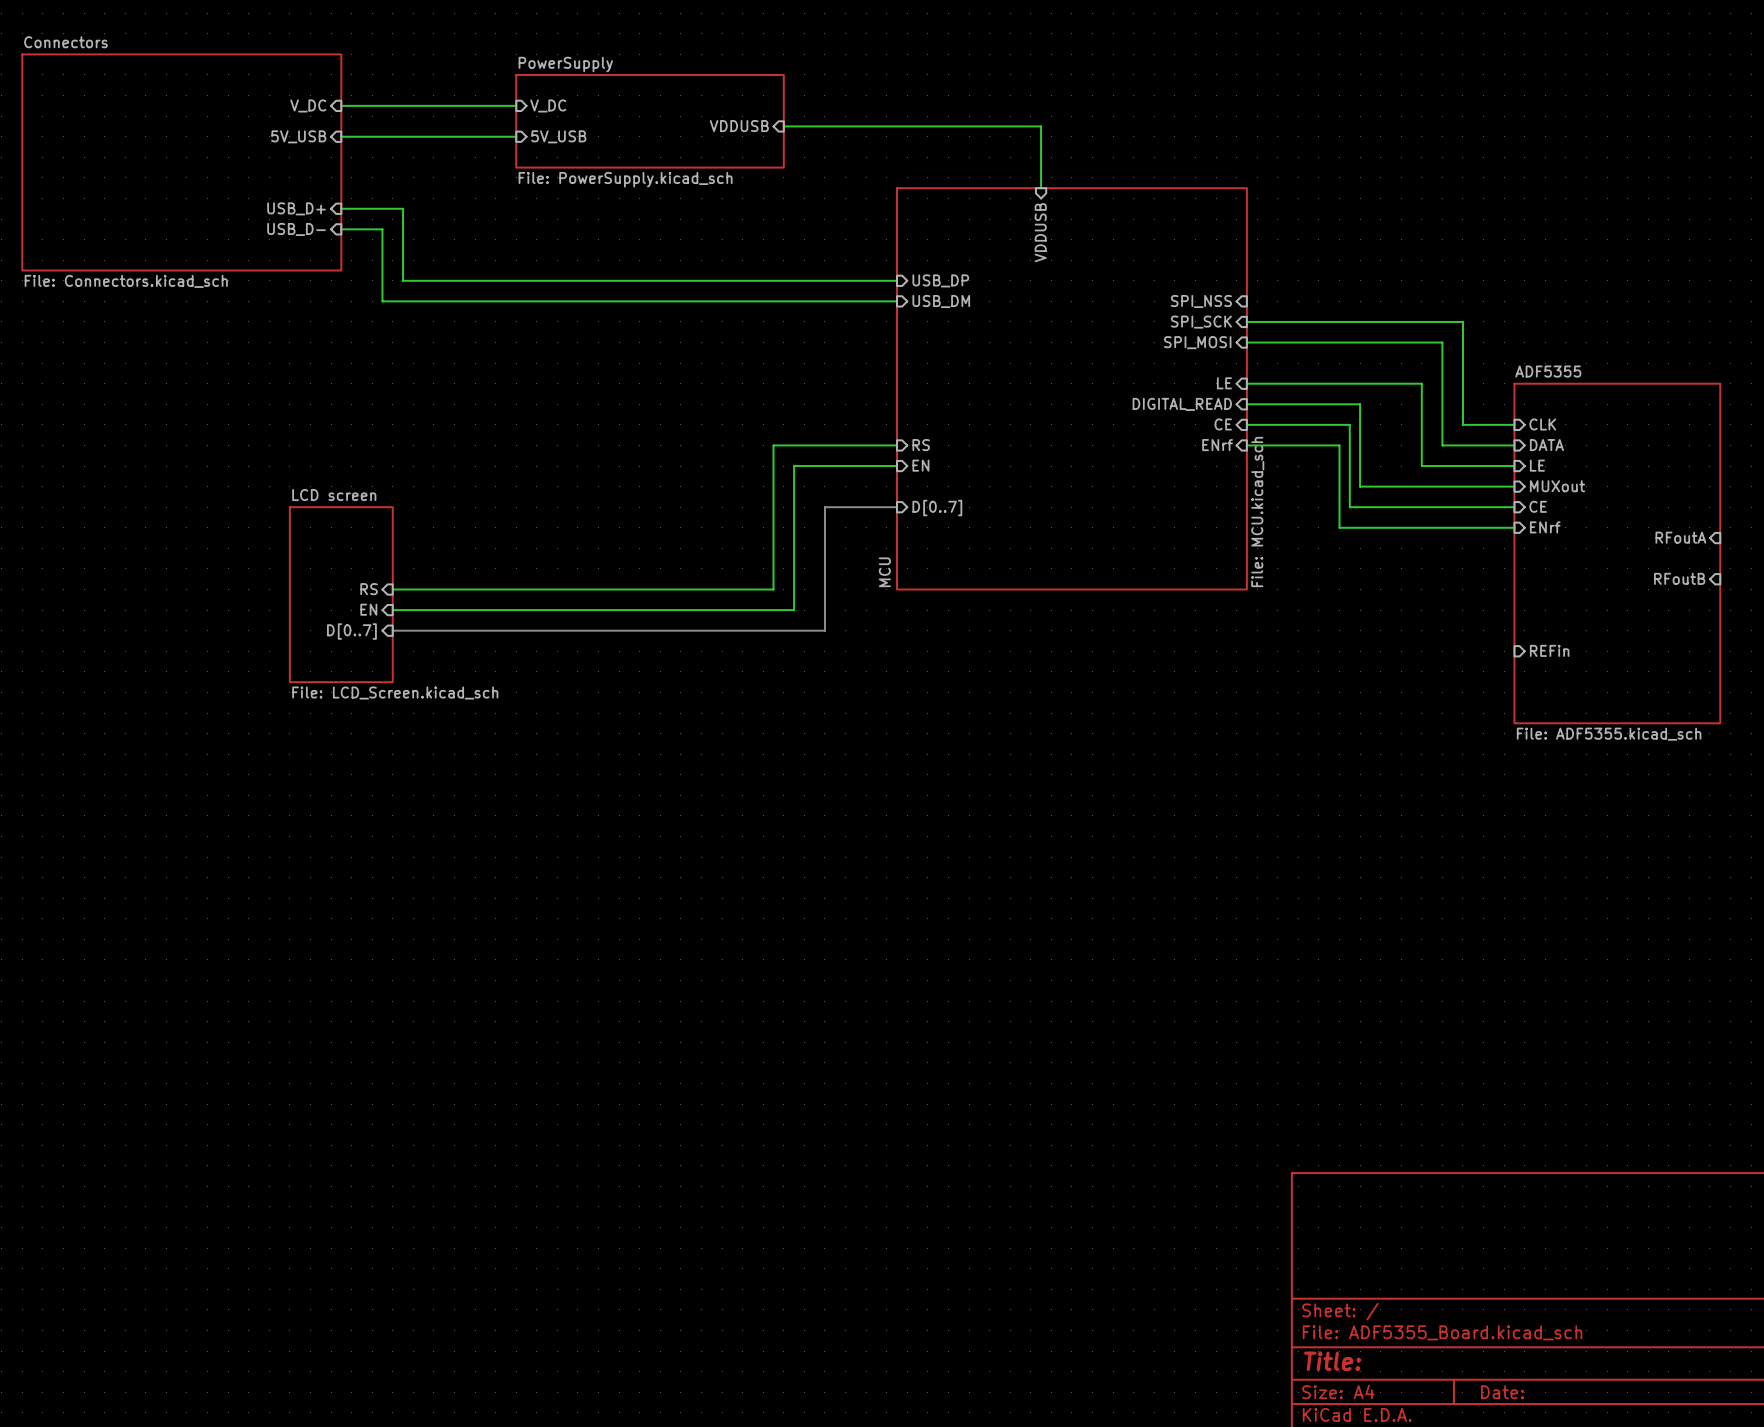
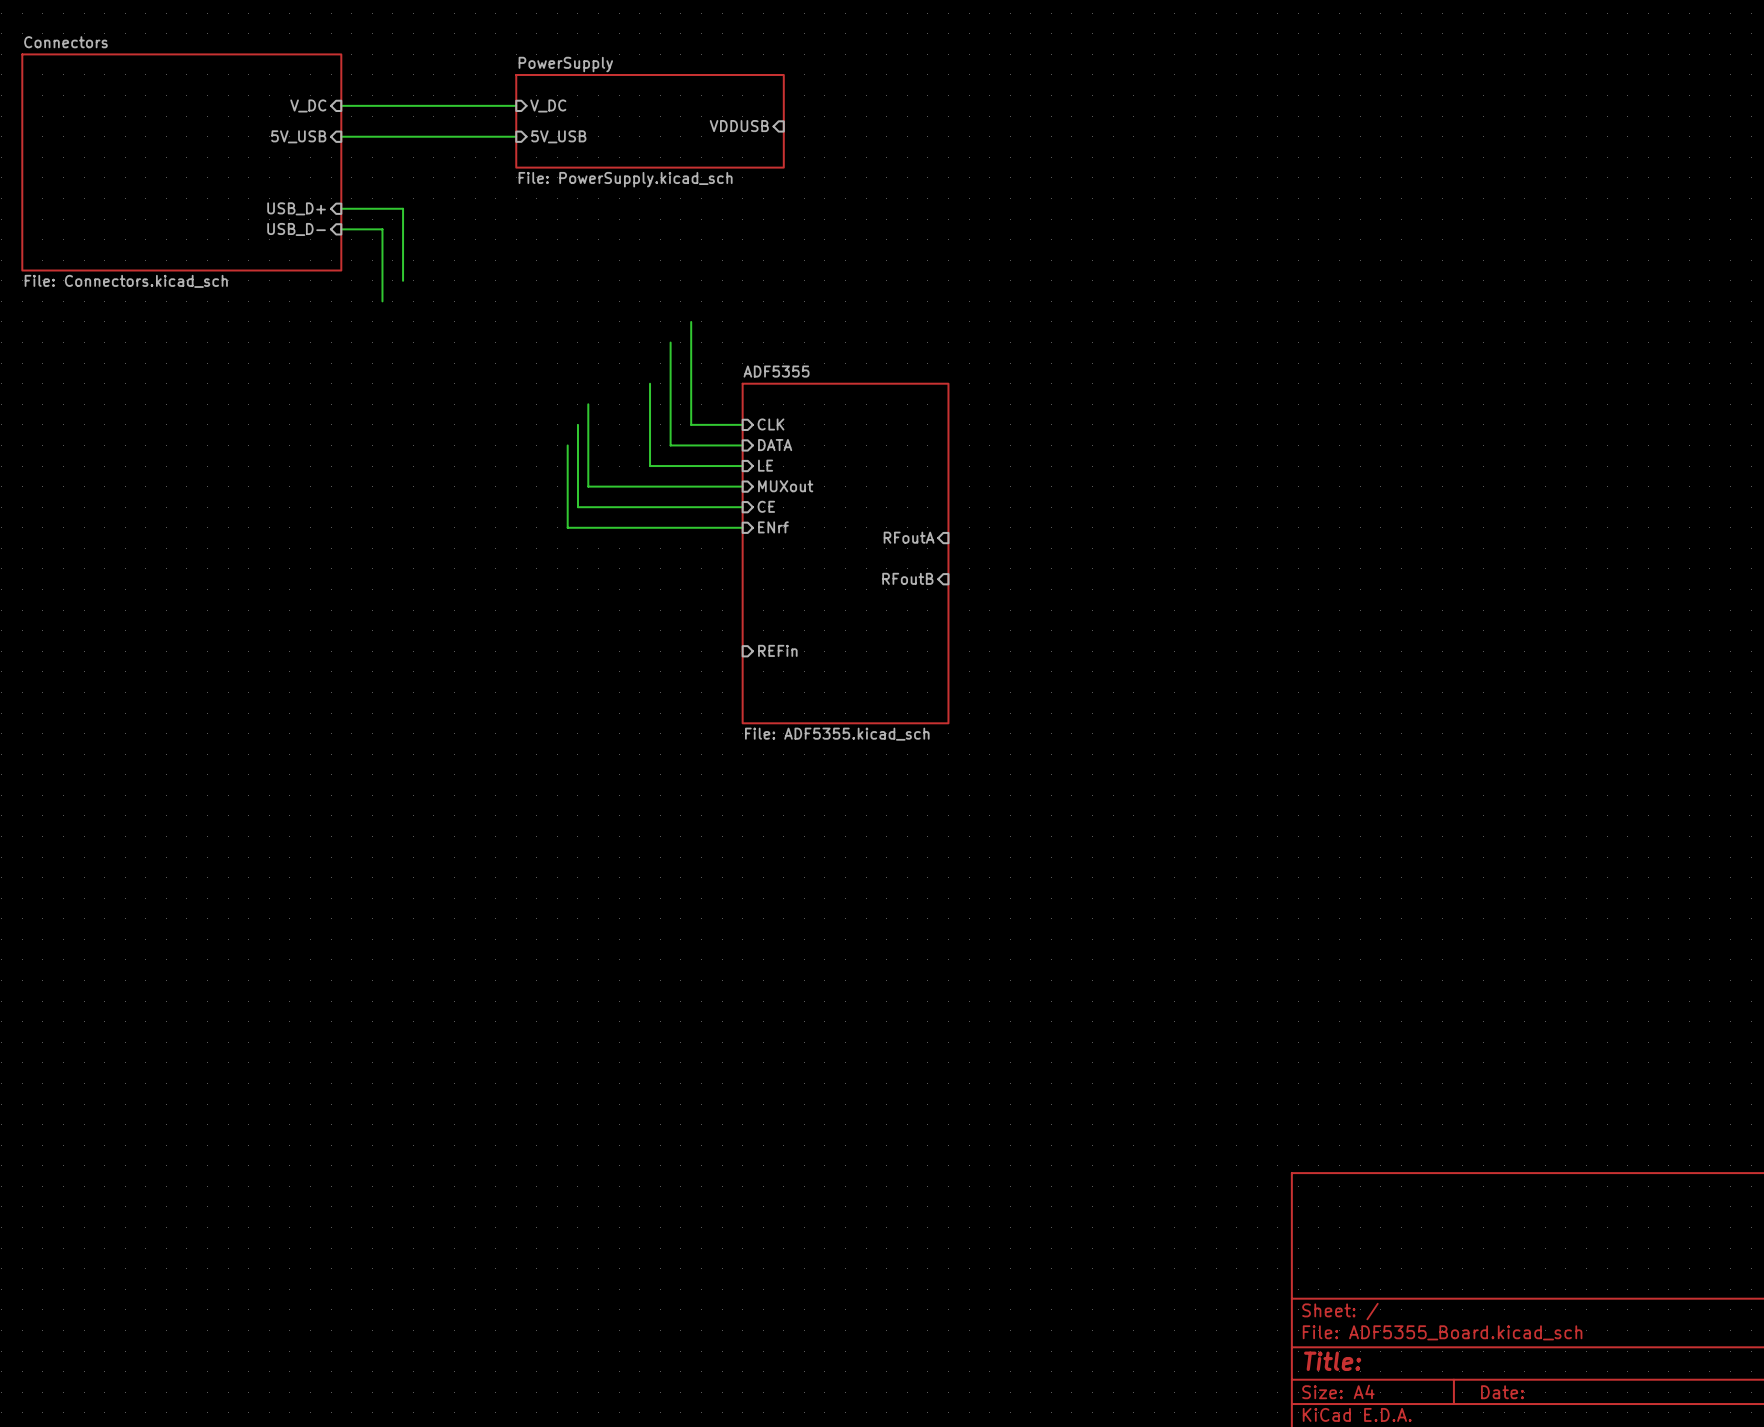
wire: (783, 126) (1041, 126) (1041, 188) -> none
sheet pin: VDDUSB (1040, 232) -> none
wire: (403, 280) (897, 280) -> none
sheet pin: USB_DP (940, 280) -> none
wire: (382, 301) (897, 301) -> none
sheet pin: USB_DM (941, 301) -> none
sheet pin: SPI_NSS (1201, 301) -> none
wire: none -> (691, 321) (691, 424) (742, 424)
wire: (1246, 321) (1462, 321) (1462, 424) (1514, 424) -> none
sheet pin: SPI_SCK (1201, 322) -> none
wire: none -> (670, 342) (670, 445) (742, 445)
sheet pin: SPI_MOSI (1197, 342) -> none
wire: (1246, 342) (1442, 342) (1442, 445) (1514, 445) -> none
wire: none -> (650, 383) (650, 466) (742, 466)
sheet pin: LE (1224, 383) -> none
wire: (1246, 383) (1421, 383) (1421, 466) (1514, 466) -> none
sheet MCU: File: MCU.kicad_sch (1071, 388) -> none
wire: none -> (588, 404) (588, 486) (742, 486)
sheet pin: DIGITAL_READ (1182, 404) -> none
wire: (1246, 404) (1360, 404) (1360, 486) (1514, 486) -> none
wire: none -> (577, 424) (577, 507) (742, 507)
sheet pin: none -> CLK (770, 424)
sheet pin: CE (1223, 424) -> none
wire: (1246, 424) (1349, 424) (1349, 507) (1514, 507) -> none
sheet pin: CLK (1542, 424) -> none
wire: none -> (567, 445) (567, 527) (742, 527)
sheet pin: none -> DATA (775, 445)
wire: (897, 445) (773, 445) (773, 589) (392, 589) -> none
sheet pin: RS (921, 445) -> none
sheet pin: ENrf (1217, 445) -> none
wire: (1246, 445) (1339, 445) (1339, 527) (1514, 527) -> none
sheet pin: DATA (1546, 445) -> none
sheet pin: none -> LE (765, 465)
sheet pin: EN (920, 465) -> none
sheet pin: LE (1537, 465) -> none
wire: (897, 466) (794, 466) (794, 610) (392, 610) -> none
sheet pin: none -> MUXout (785, 486)
sheet pin: MUXout (1557, 486) -> none
sheet pin: none -> CE (766, 506)
sheet pin: CE (1538, 506) -> none
bus: (897, 507) (824, 507) (824, 630) (392, 630) -> none
sheet pin: D[0..7] (937, 508) -> none
sheet pin: none -> ENrf (773, 527)
sheet pin: ENrf (1545, 527) -> none
sheet pin: none -> RFoutA (909, 537)
sheet pin: RFoutA (1680, 537) -> none
sheet ADF5355 position: (1617, 553) -> (845, 553)
sheet pin: none -> RFoutB (907, 578)
sheet pin: RFoutB (1679, 578) -> none
sheet pin: RS (369, 589) -> none
sheet LCD screen: File: LCD_Screen.kicad_sch (341, 594) -> none
sheet pin: EN (368, 609) -> none
sheet pin: D[0..7] (351, 631) -> none
sheet pin: none -> REFin (777, 650)
sheet pin: REFin (1549, 650) -> none

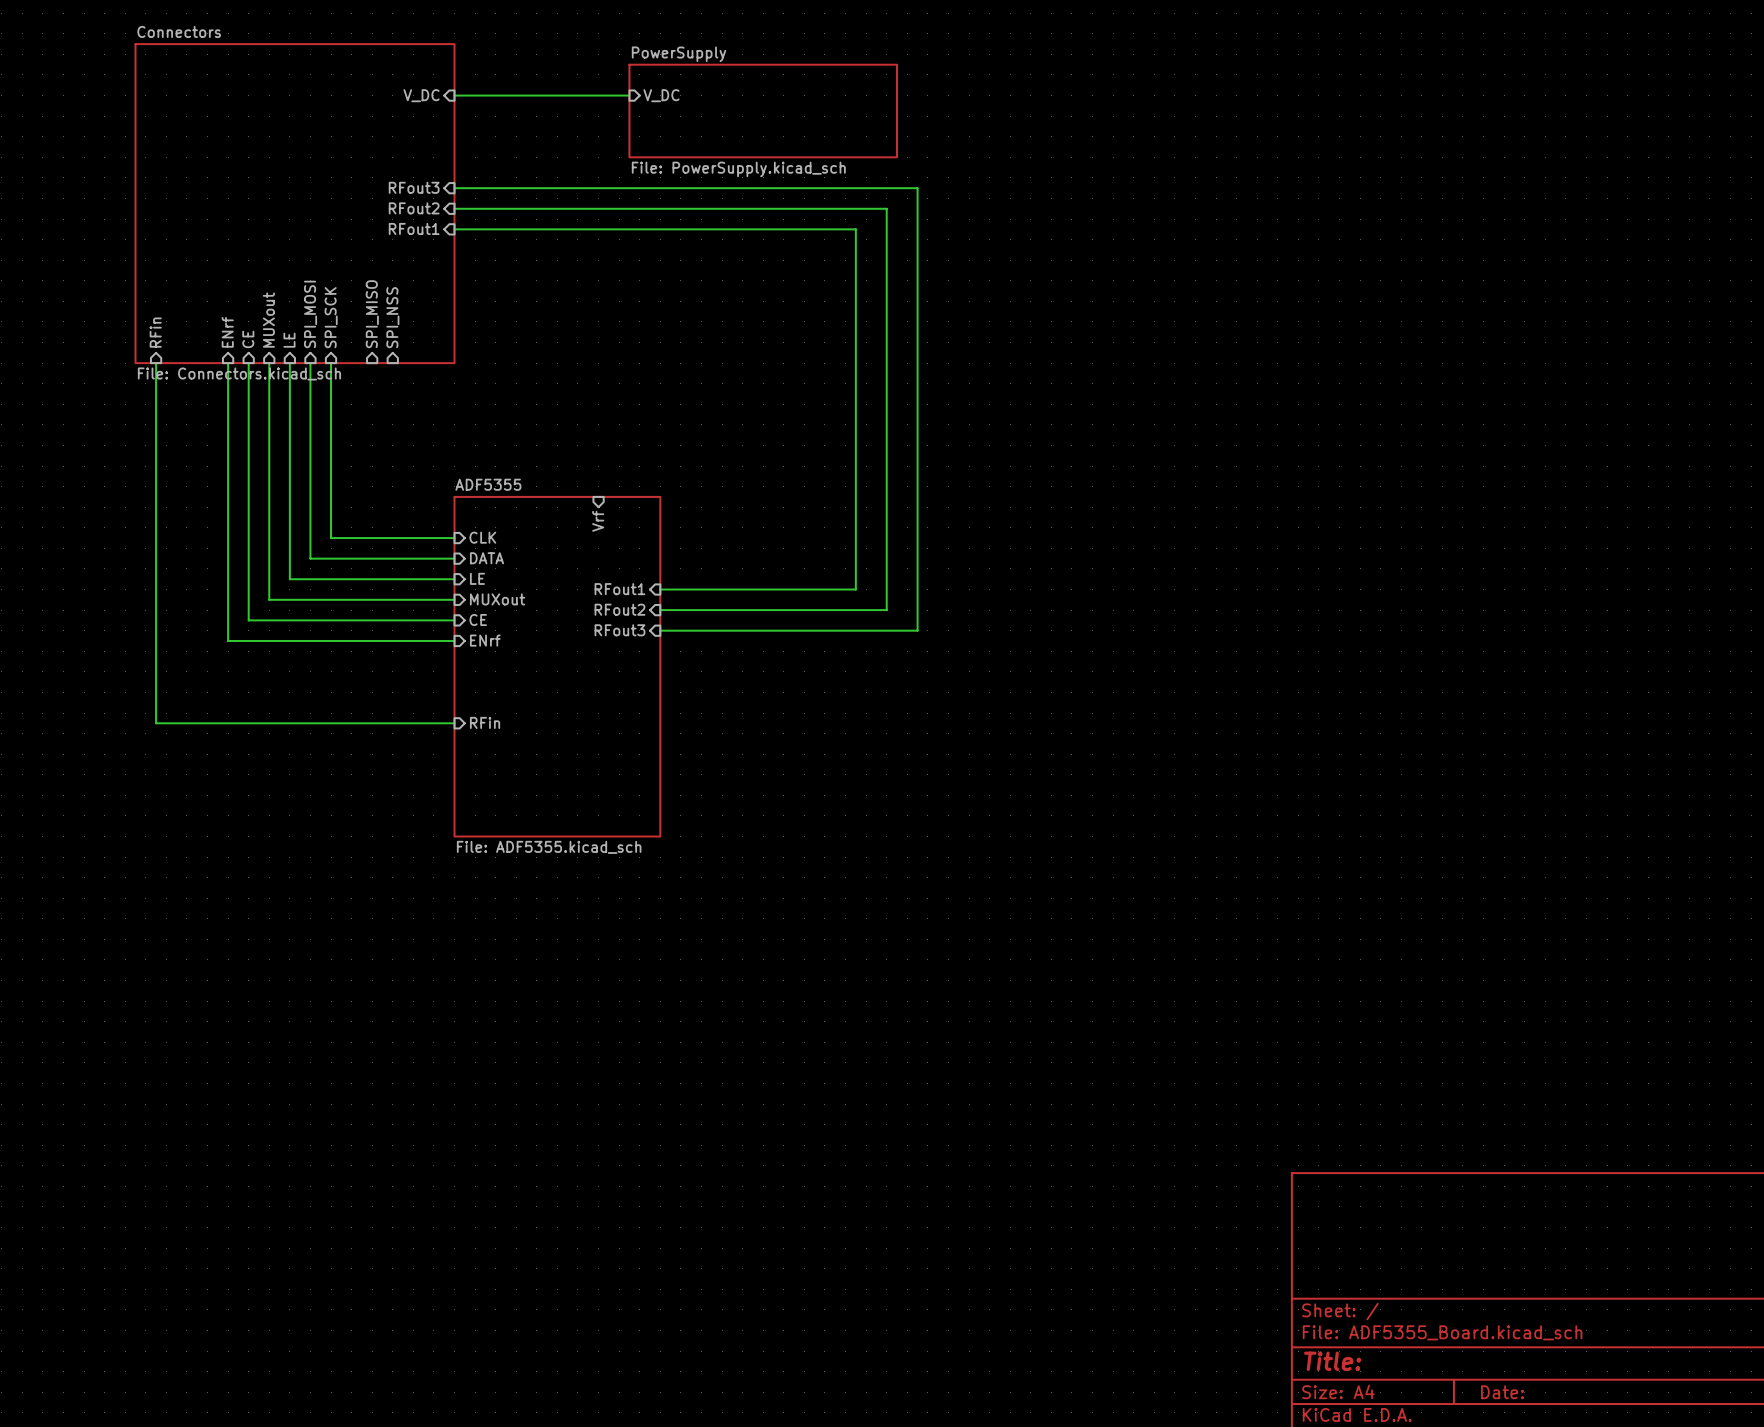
sheet pin: none -> V_DC (421, 95)
sheet pin: none -> V_DC (661, 95)
sheet pin: V_DC (308, 105) -> none
wire: (341, 105) (516, 105) -> (454, 95) (629, 95)
sheet pin: V_DC (548, 105) -> none
sheet PowerSupply position: (650, 121) -> (763, 111)
sheet pin: VDDUSB (739, 126) -> none
sheet pin: 5V_USB (298, 136) -> none
wire: (341, 136) (516, 136) -> none
sheet pin: 5V_USB (558, 136) -> none
sheet Connectors: File: Connectors.kicad_sch (181, 162) -> none
sheet pin: none -> RFout3 (414, 187)
wire: none -> (454, 188) (917, 188) (917, 630) (660, 630)
sheet Connectors: none -> File: Connectors.kicad_sch (295, 203)
sheet pin: USB_D+ (296, 208) -> none
wire: (341, 208) (403, 208) (403, 280) -> none
sheet pin: none -> RFout2 (414, 208)
wire: none -> (454, 208) (886, 208) (886, 610) (660, 610)
sheet pin: none -> RFout1 (414, 228)
sheet pin: USB_D- (296, 229) -> none
wire: (341, 229) (382, 229) (382, 301) -> none
wire: none -> (454, 229) (855, 229) (855, 589) (660, 589)
sheet pin: none -> SPI_MOSI (310, 314)
sheet pin: none -> SPI_MISO (372, 314)
sheet pin: none -> SPI_SCK (331, 317)
sheet pin: none -> SPI_NSS (392, 317)
sheet pin: none -> MUXout (268, 320)
wire: (691, 321) (691, 424) (742, 424) -> none
sheet pin: none -> RFin (155, 332)
sheet pin: none -> ENrf (227, 332)
sheet pin: none -> CE (248, 339)
sheet pin: none -> LE (289, 340)
wire: (670, 342) (670, 445) (742, 445) -> none
wire: none -> (156, 363) (156, 723) (454, 723)
wire: none -> (228, 363) (228, 640) (454, 640)
wire: none -> (248, 363) (248, 620) (454, 620)
wire: none -> (269, 363) (269, 599) (454, 599)
wire: none -> (289, 363) (289, 579) (454, 579)
wire: none -> (310, 363) (310, 558) (454, 558)
wire: none -> (331, 363) (331, 538) (454, 538)
wire: (650, 383) (650, 466) (742, 466) -> none
wire: (588, 404) (588, 486) (742, 486) -> none
wire: (577, 424) (577, 507) (742, 507) -> none
sheet pin: CLK (770, 424) -> none
wire: (567, 445) (567, 527) (742, 527) -> none
sheet pin: DATA (775, 445) -> none
sheet pin: LE (765, 465) -> none
sheet pin: MUXout (785, 486) -> none
sheet pin: CE (766, 506) -> none
sheet pin: none -> Vrf (598, 521)
sheet pin: ENrf (773, 527) -> none
sheet pin: none -> CLK (482, 537)
sheet pin: RFoutA (909, 537) -> none
sheet ADF5355 position: (845, 553) -> (557, 666)
sheet pin: none -> DATA (487, 558)
sheet pin: none -> LE (477, 578)
sheet pin: RFoutB (907, 578) -> none
sheet pin: none -> RFout1 (619, 589)
sheet pin: none -> MUXout (497, 599)
sheet pin: none -> RFout2 (619, 609)
sheet pin: none -> CE (478, 620)
sheet pin: none -> RFout3 (619, 630)
sheet pin: none -> ENrf (485, 640)
sheet pin: REFin (777, 650) -> none
sheet pin: none -> RFin (485, 722)

